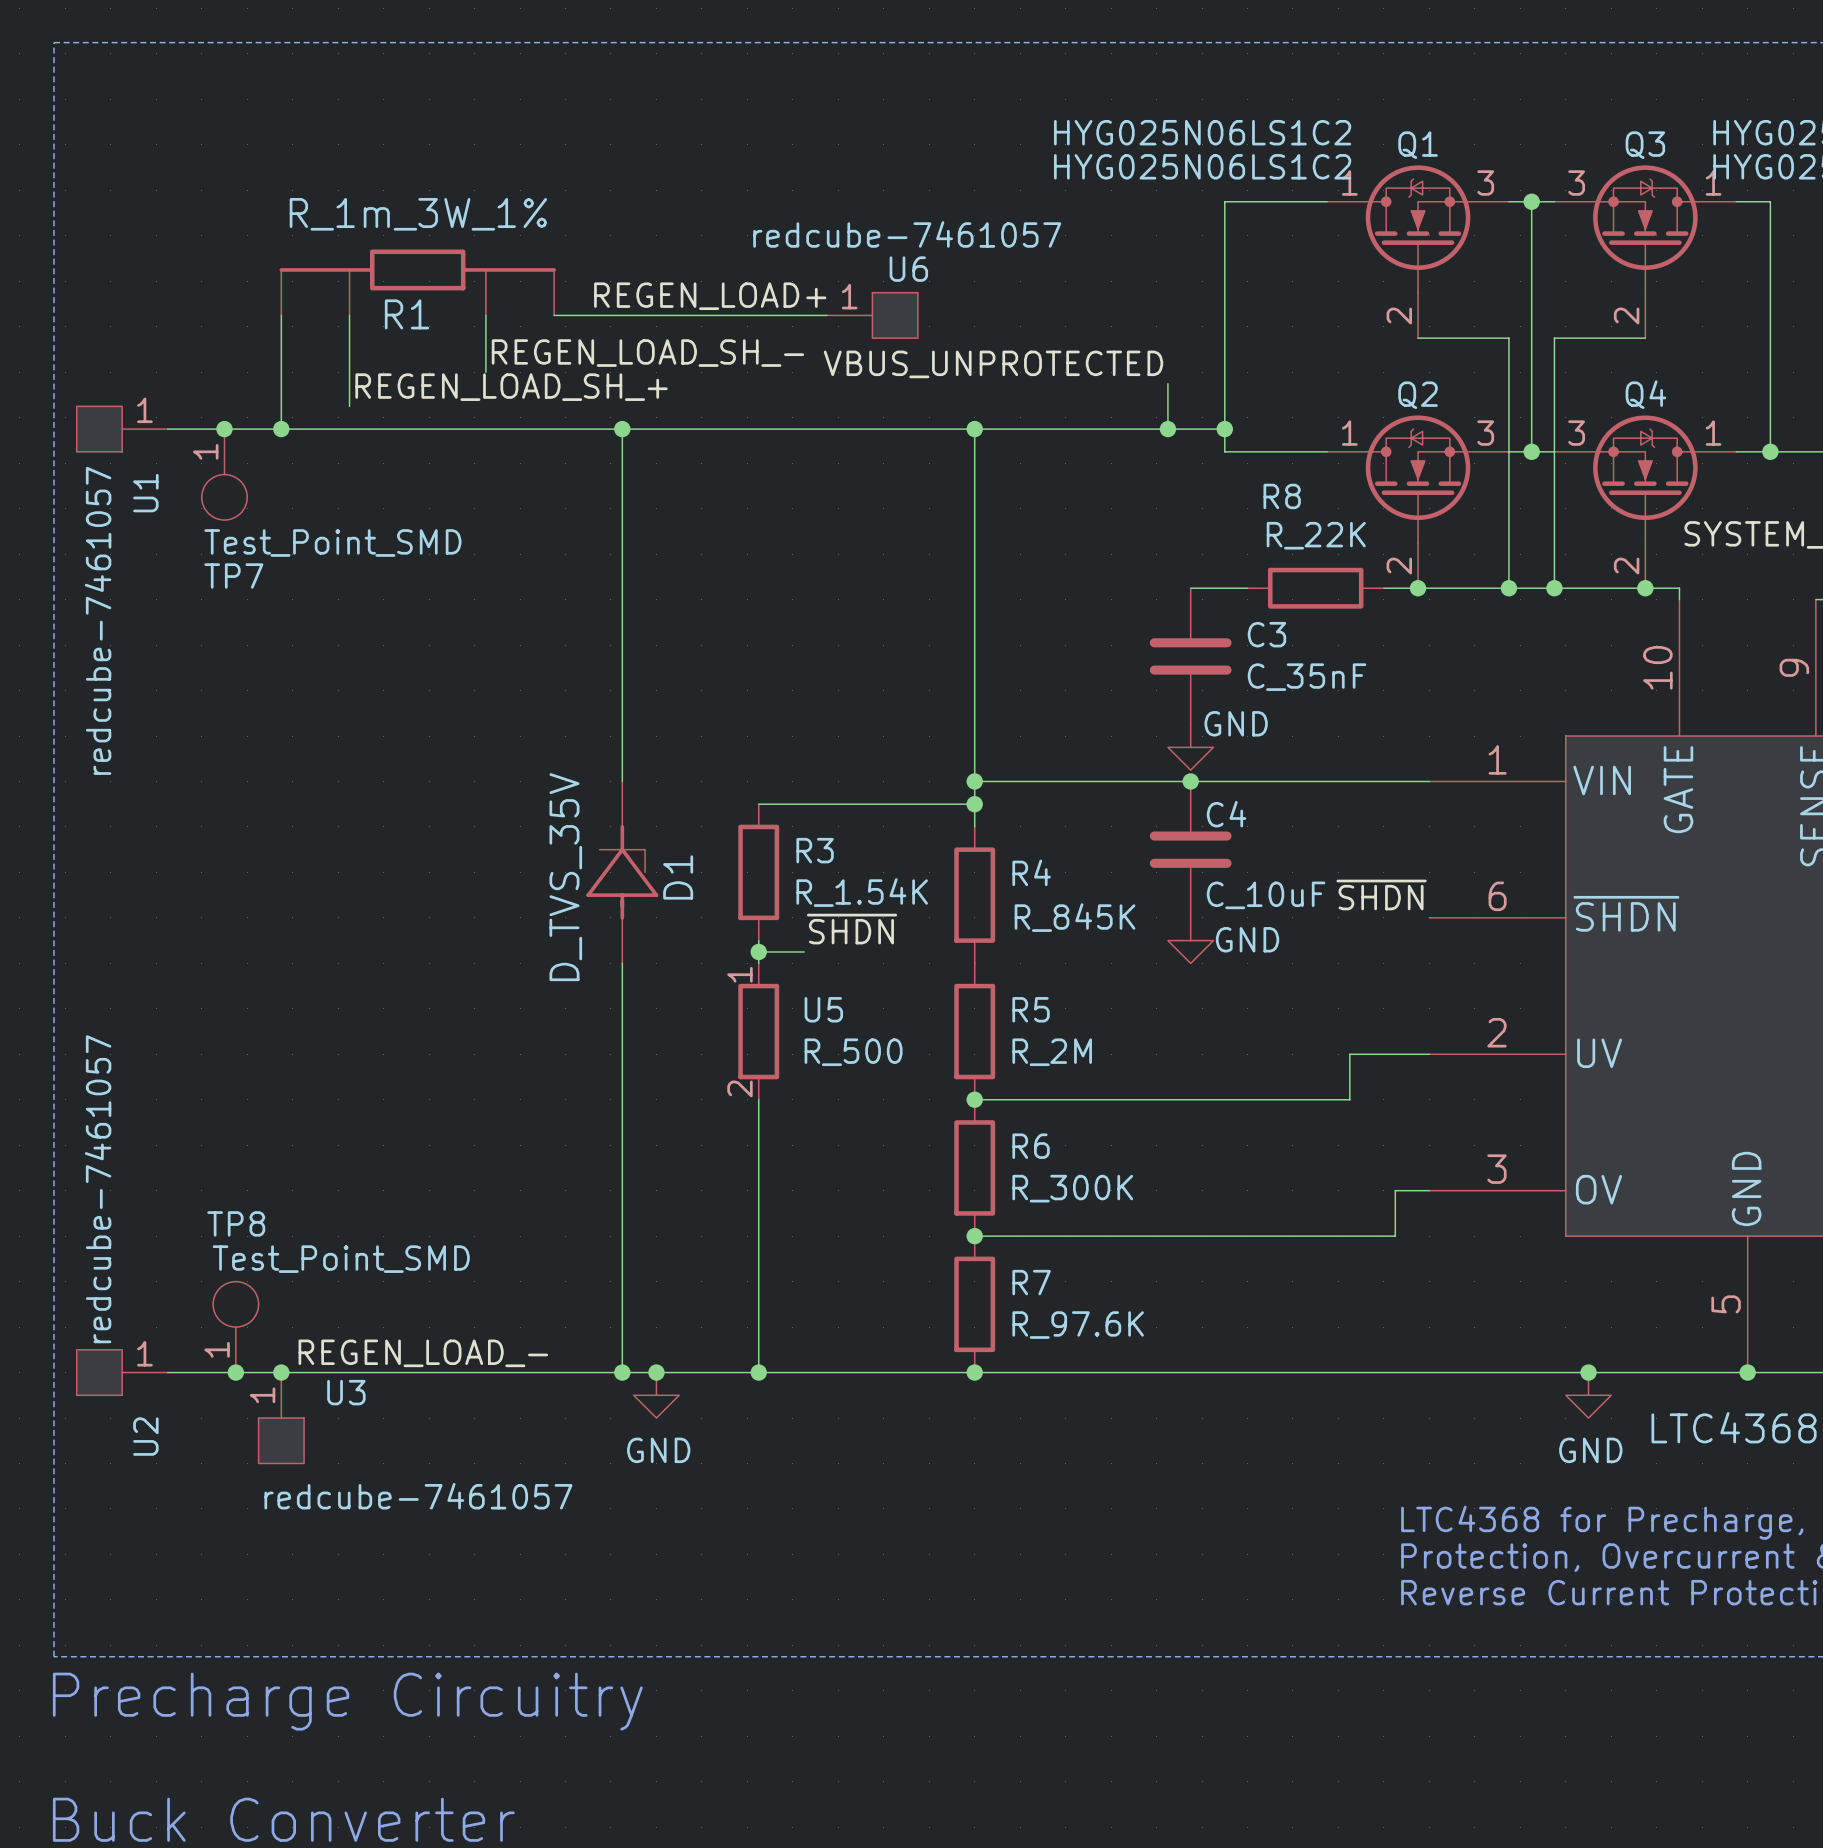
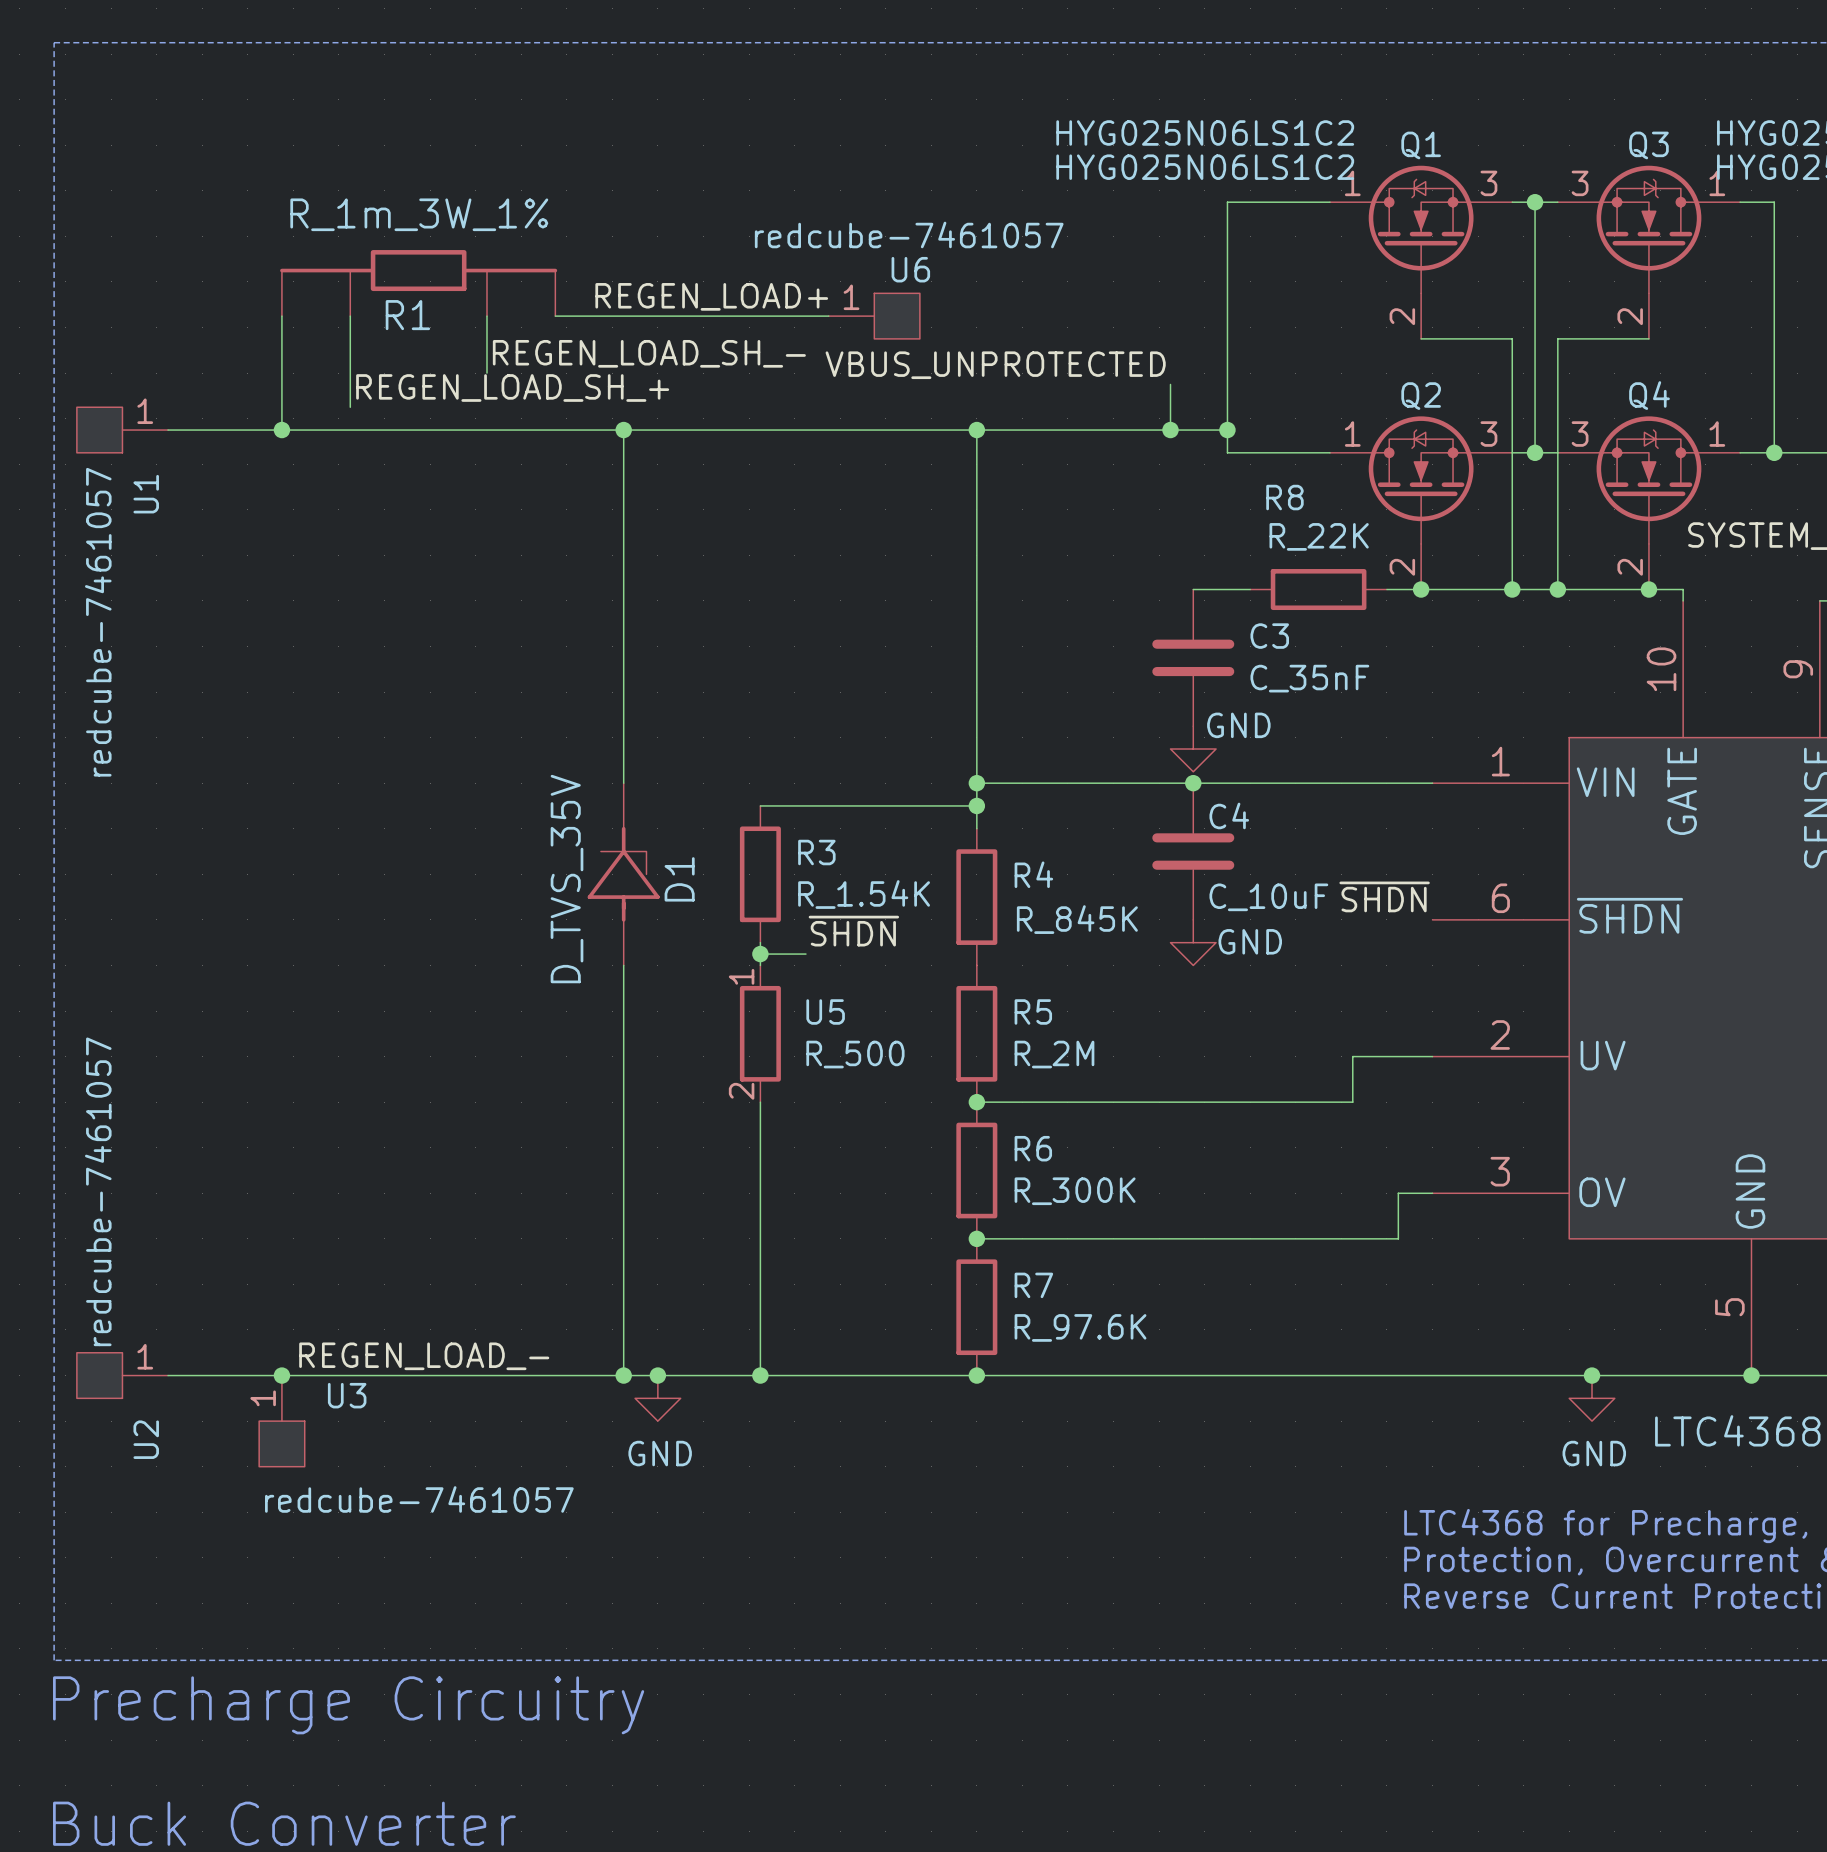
junction: (224, 429) -> none
TP7: Test_Point_SMD (224, 474) -> none
TP8: Test_Point_SMD (235, 1327) -> none
junction: (235, 1372) -> none

